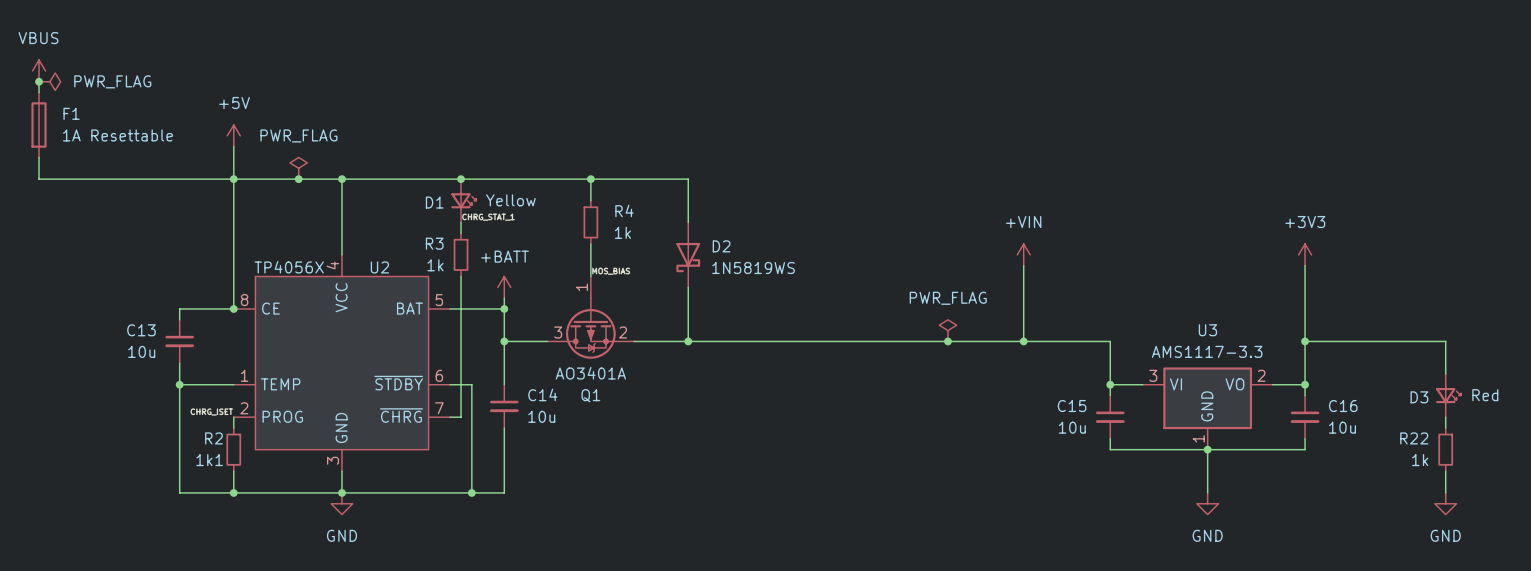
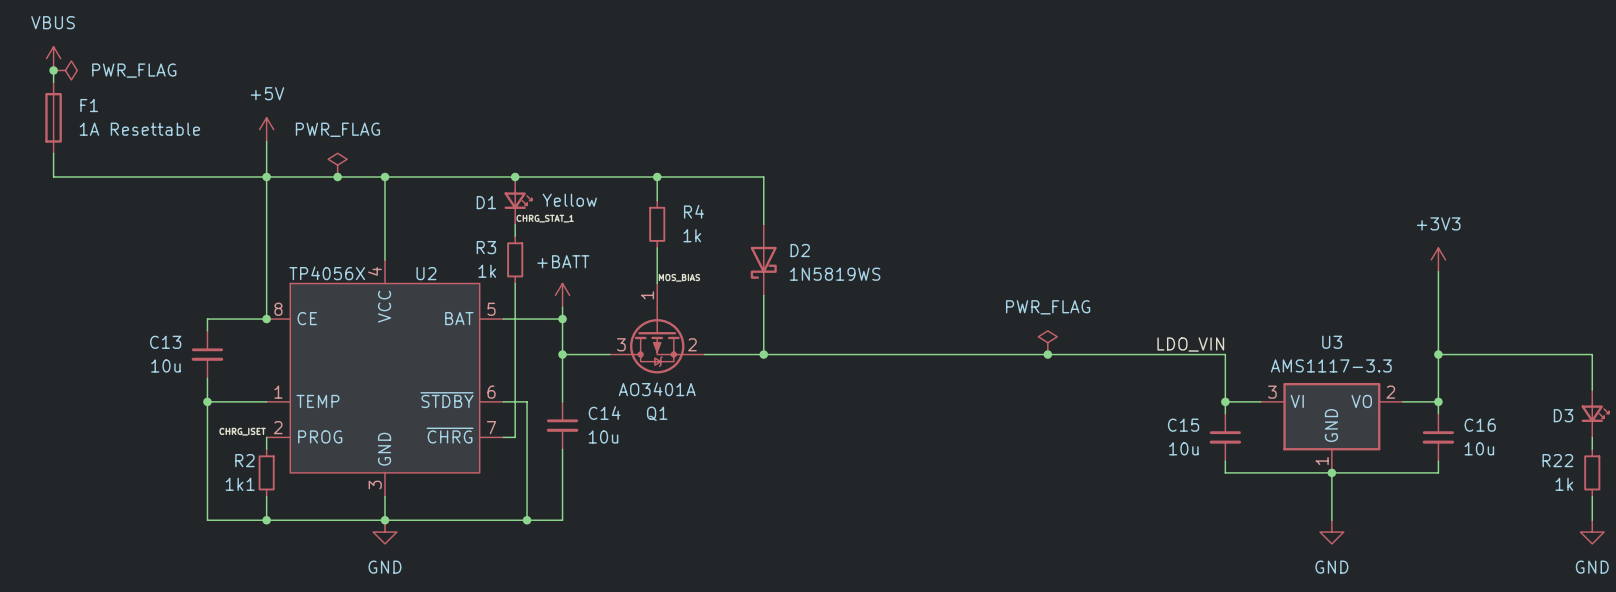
power symbol: +VIN (1023, 254) -> none
wire: (1023, 265) (1023, 341) -> none
label: none -> LDO_VIN (1190, 344)
junction: (1023, 341) -> none

